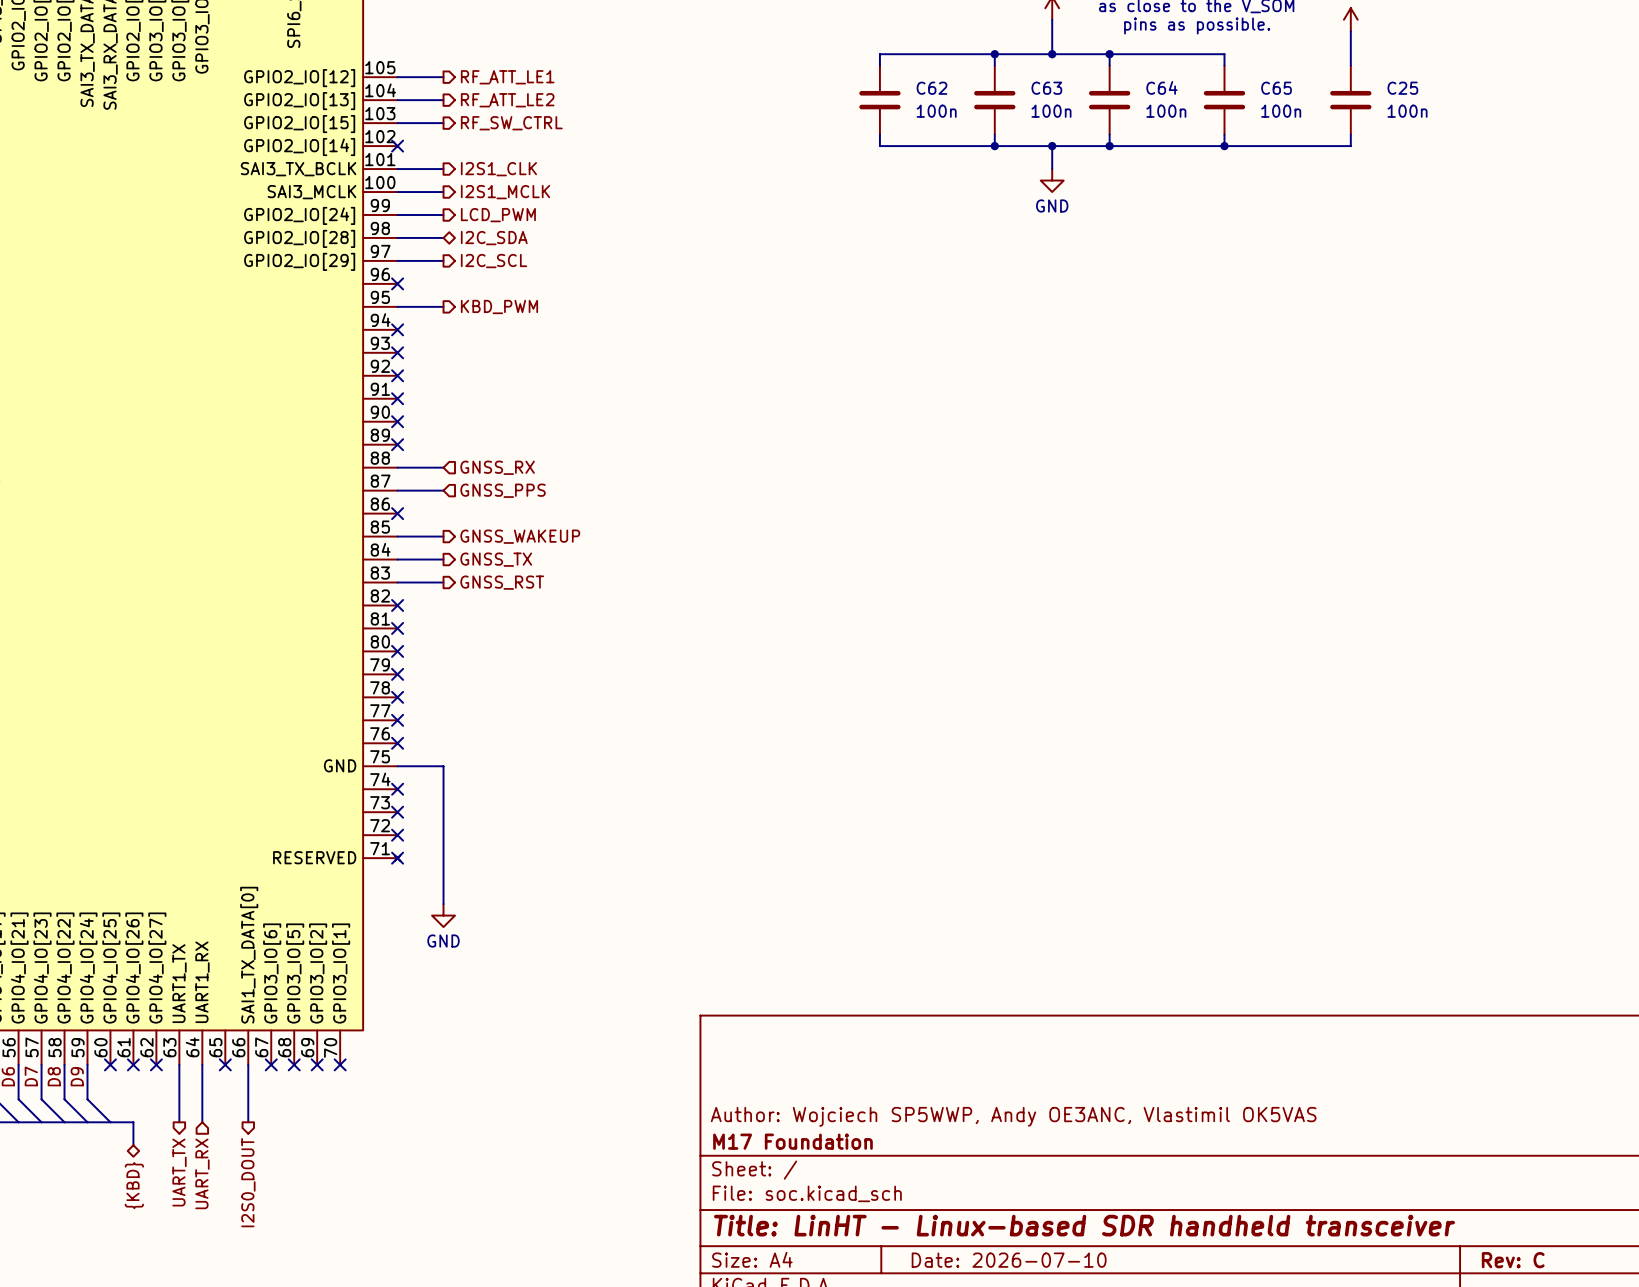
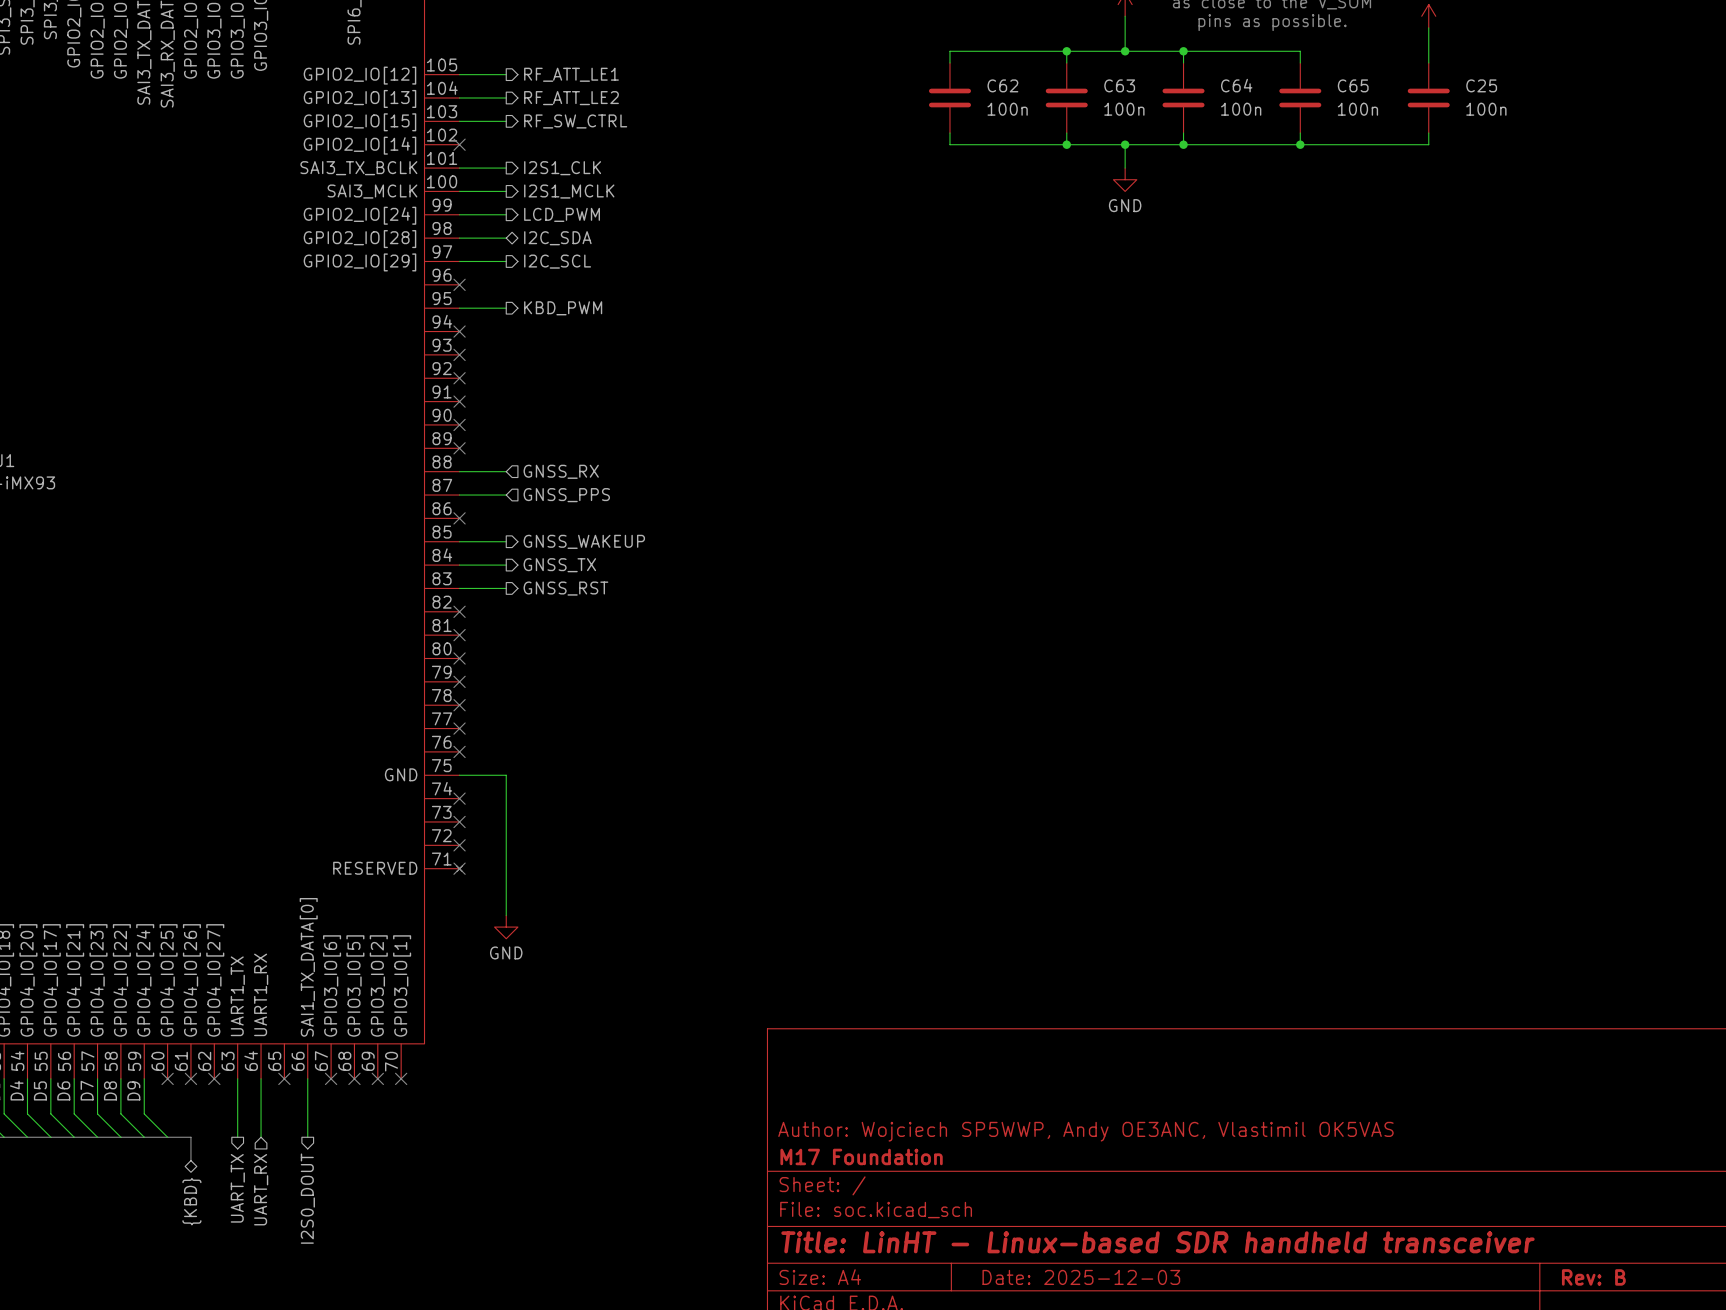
title block: Date: 2026-07-10 (1009, 1260) -> Date: 2025-12-03 (1081, 1277)
title block: Rev: C (1513, 1260) -> Rev: B (1593, 1277)

